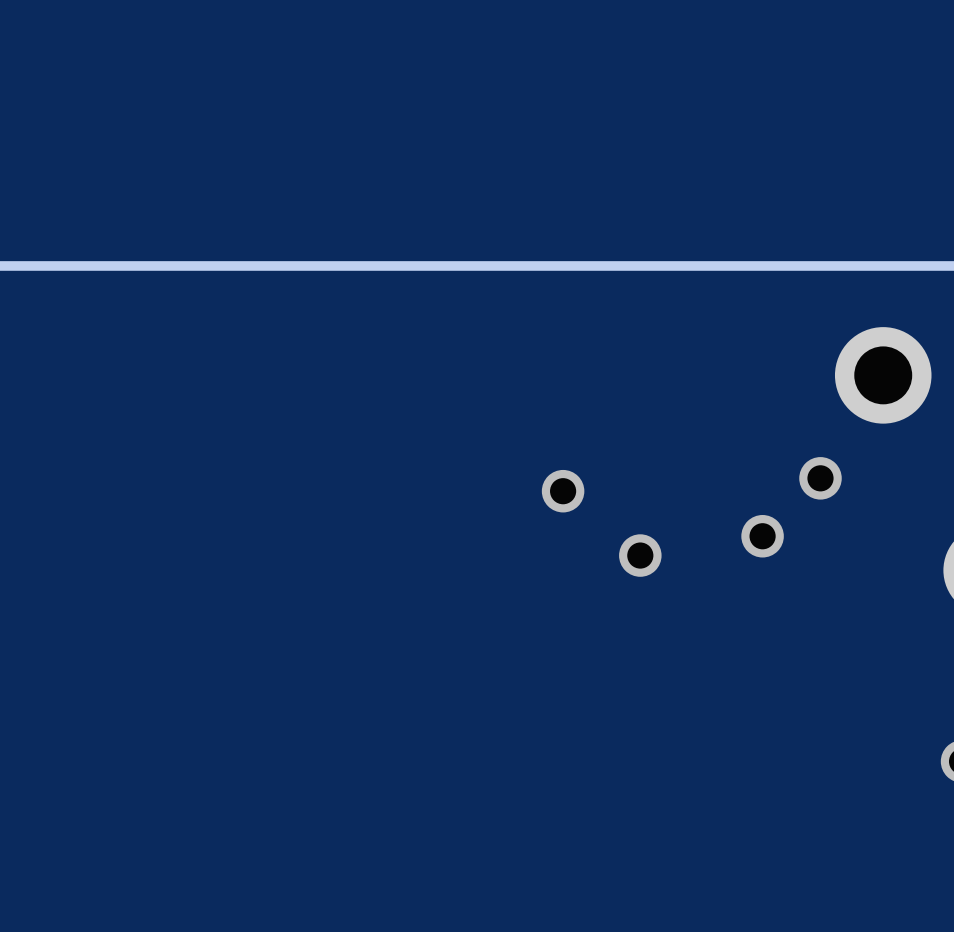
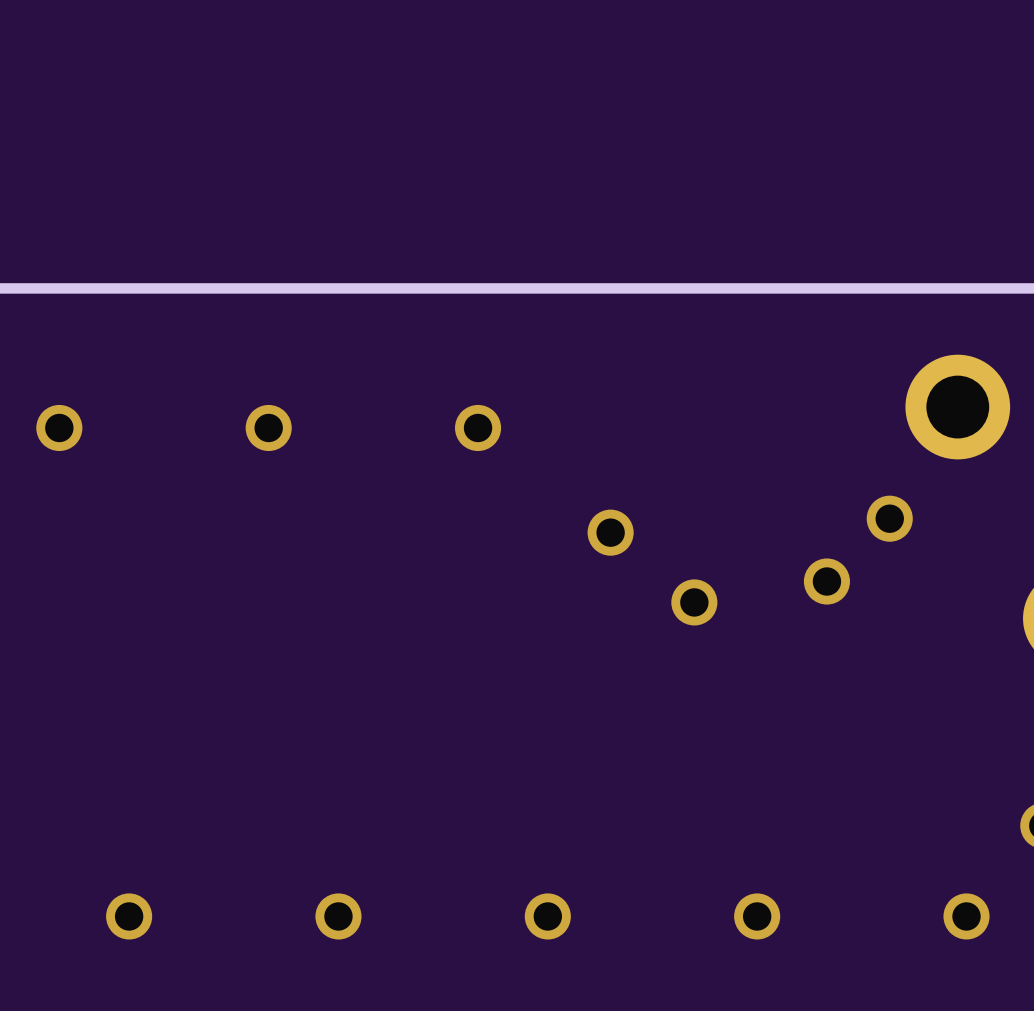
via: none -> (59, 427)
via: none -> (268, 427)
via: none -> (478, 427)
via: none -> (129, 916)
via: none -> (338, 916)
via: none -> (547, 916)
via: none -> (757, 916)
via: none -> (966, 916)

